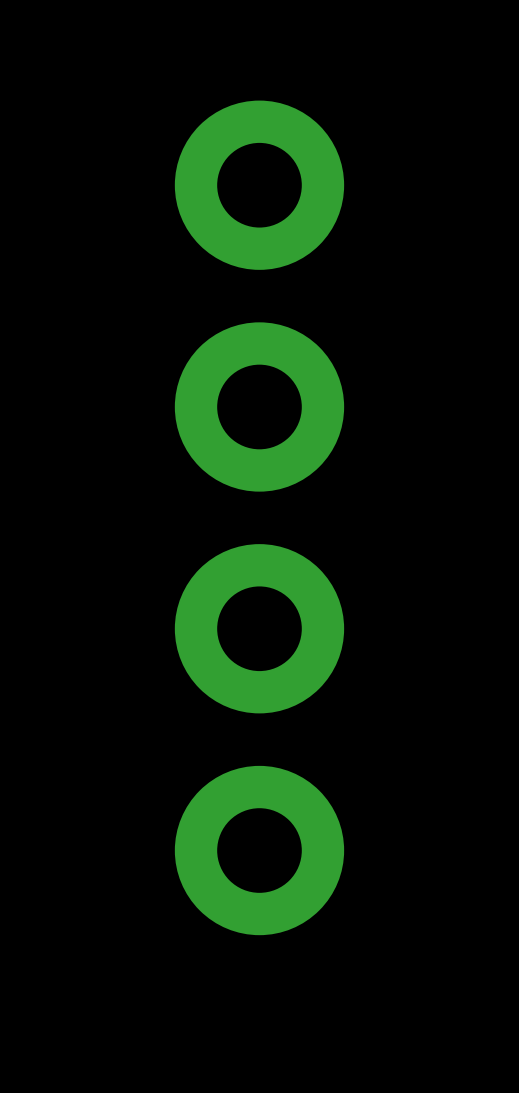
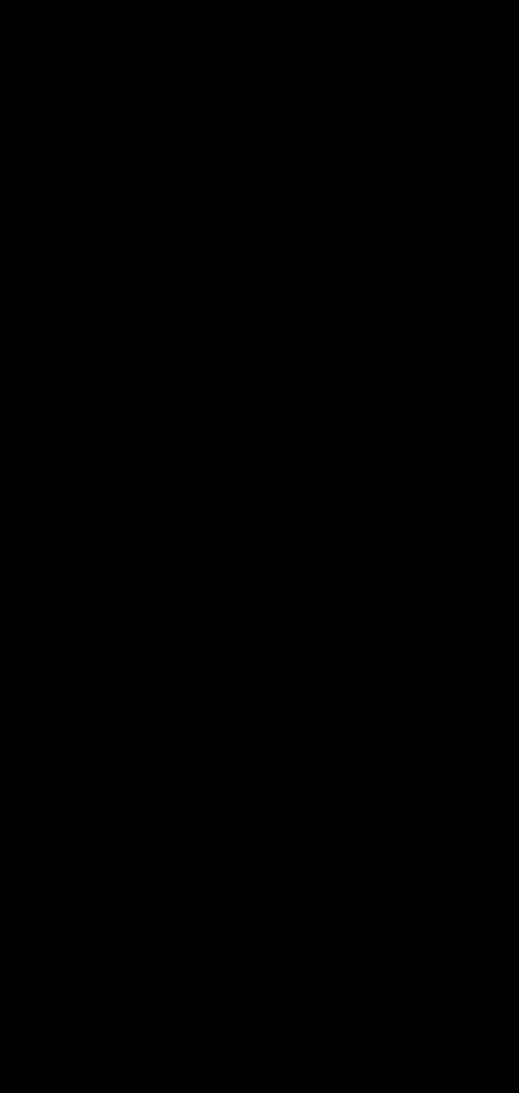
part: (259, 185) -> none
part: (259, 406) -> none
part: (259, 628) -> none
part: (259, 850) -> none

